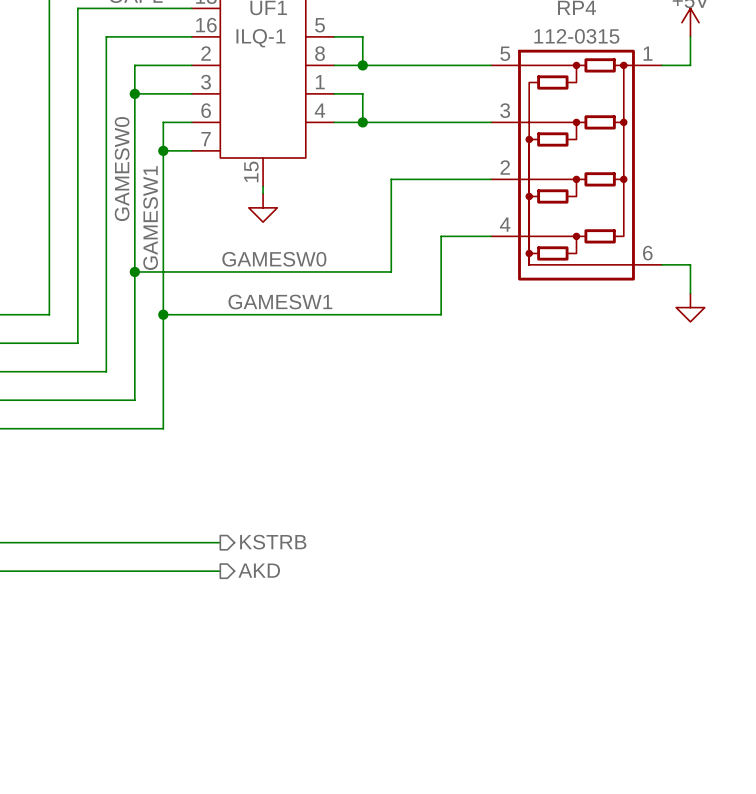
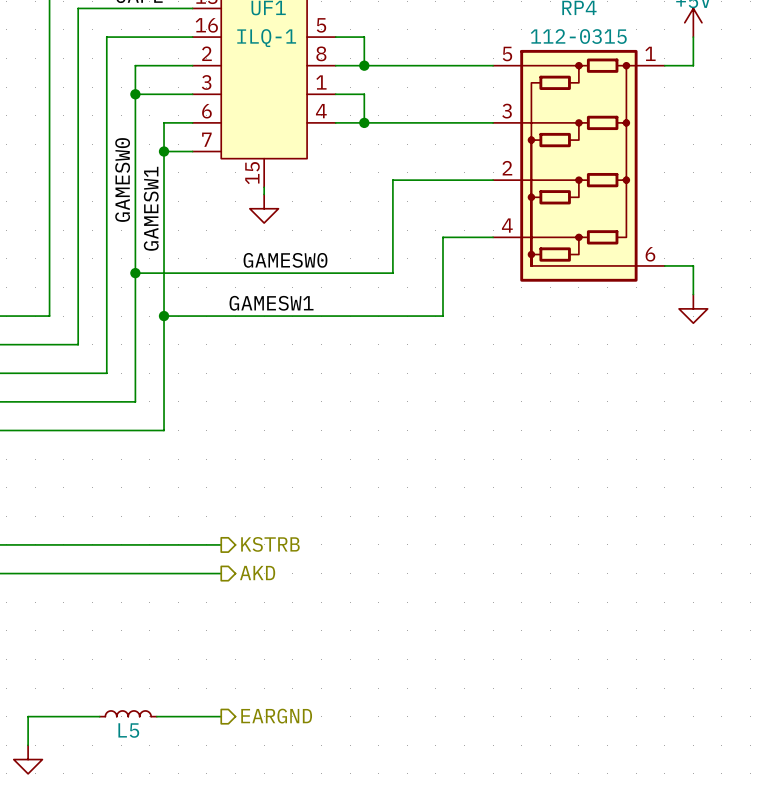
L5: none -> (128, 713)
wire: none -> (99, 716) (28, 716) (28, 745)
wire: none -> (156, 716) (221, 716)
hierarchical label: none -> EARGND (276, 716)
power symbol: none -> (28, 759)

